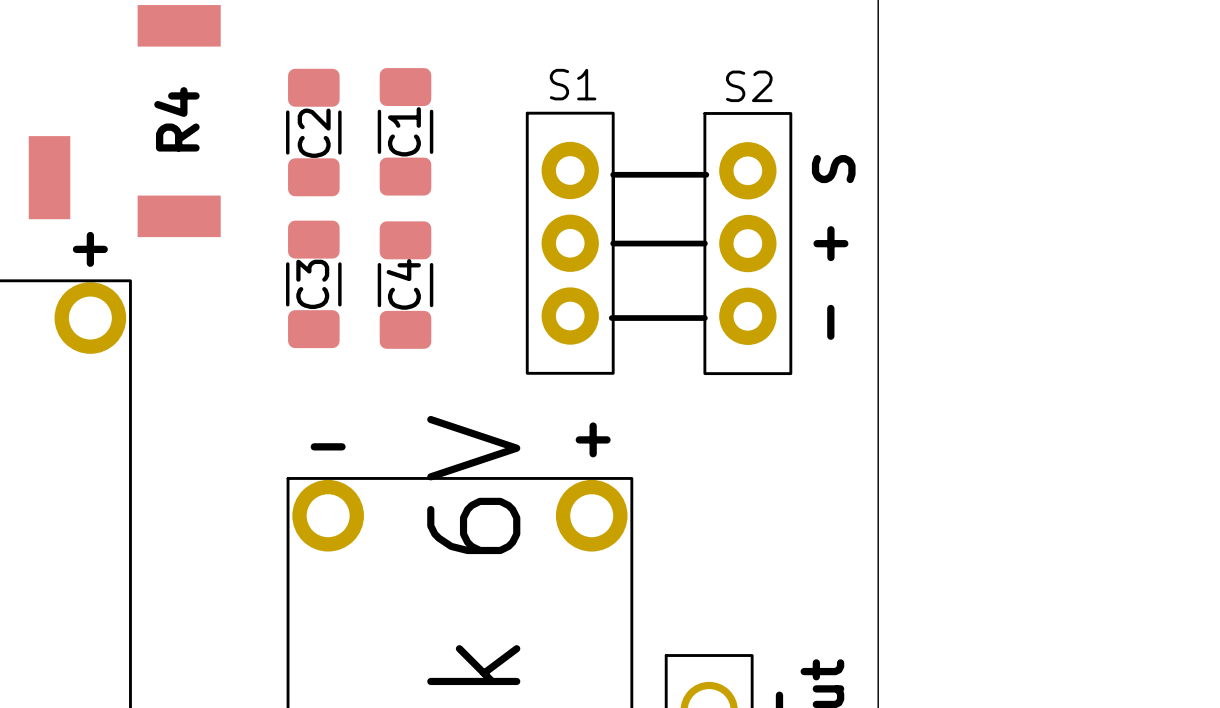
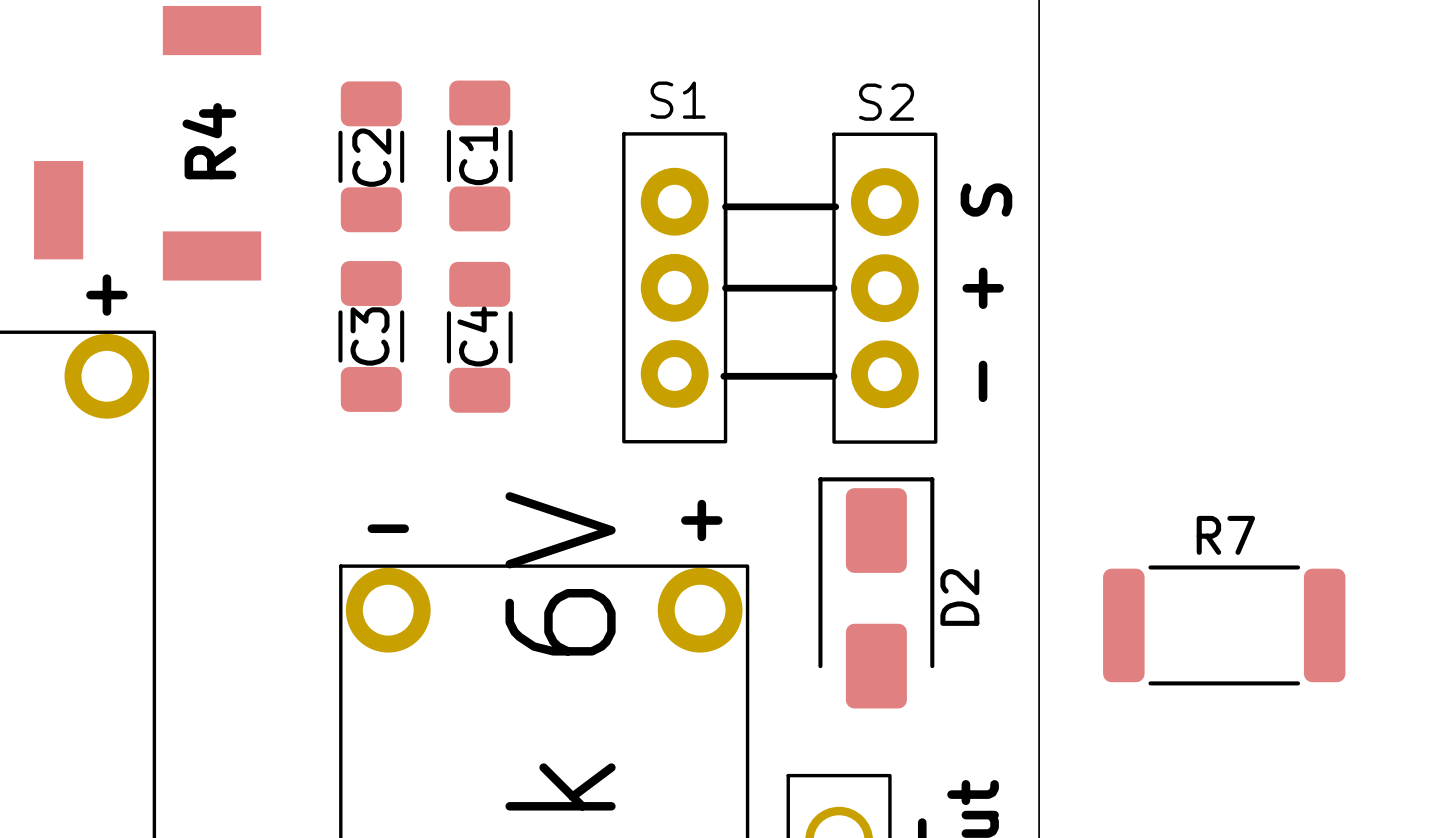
D2: none -> (876, 592)
R7: none -> (1224, 625)

